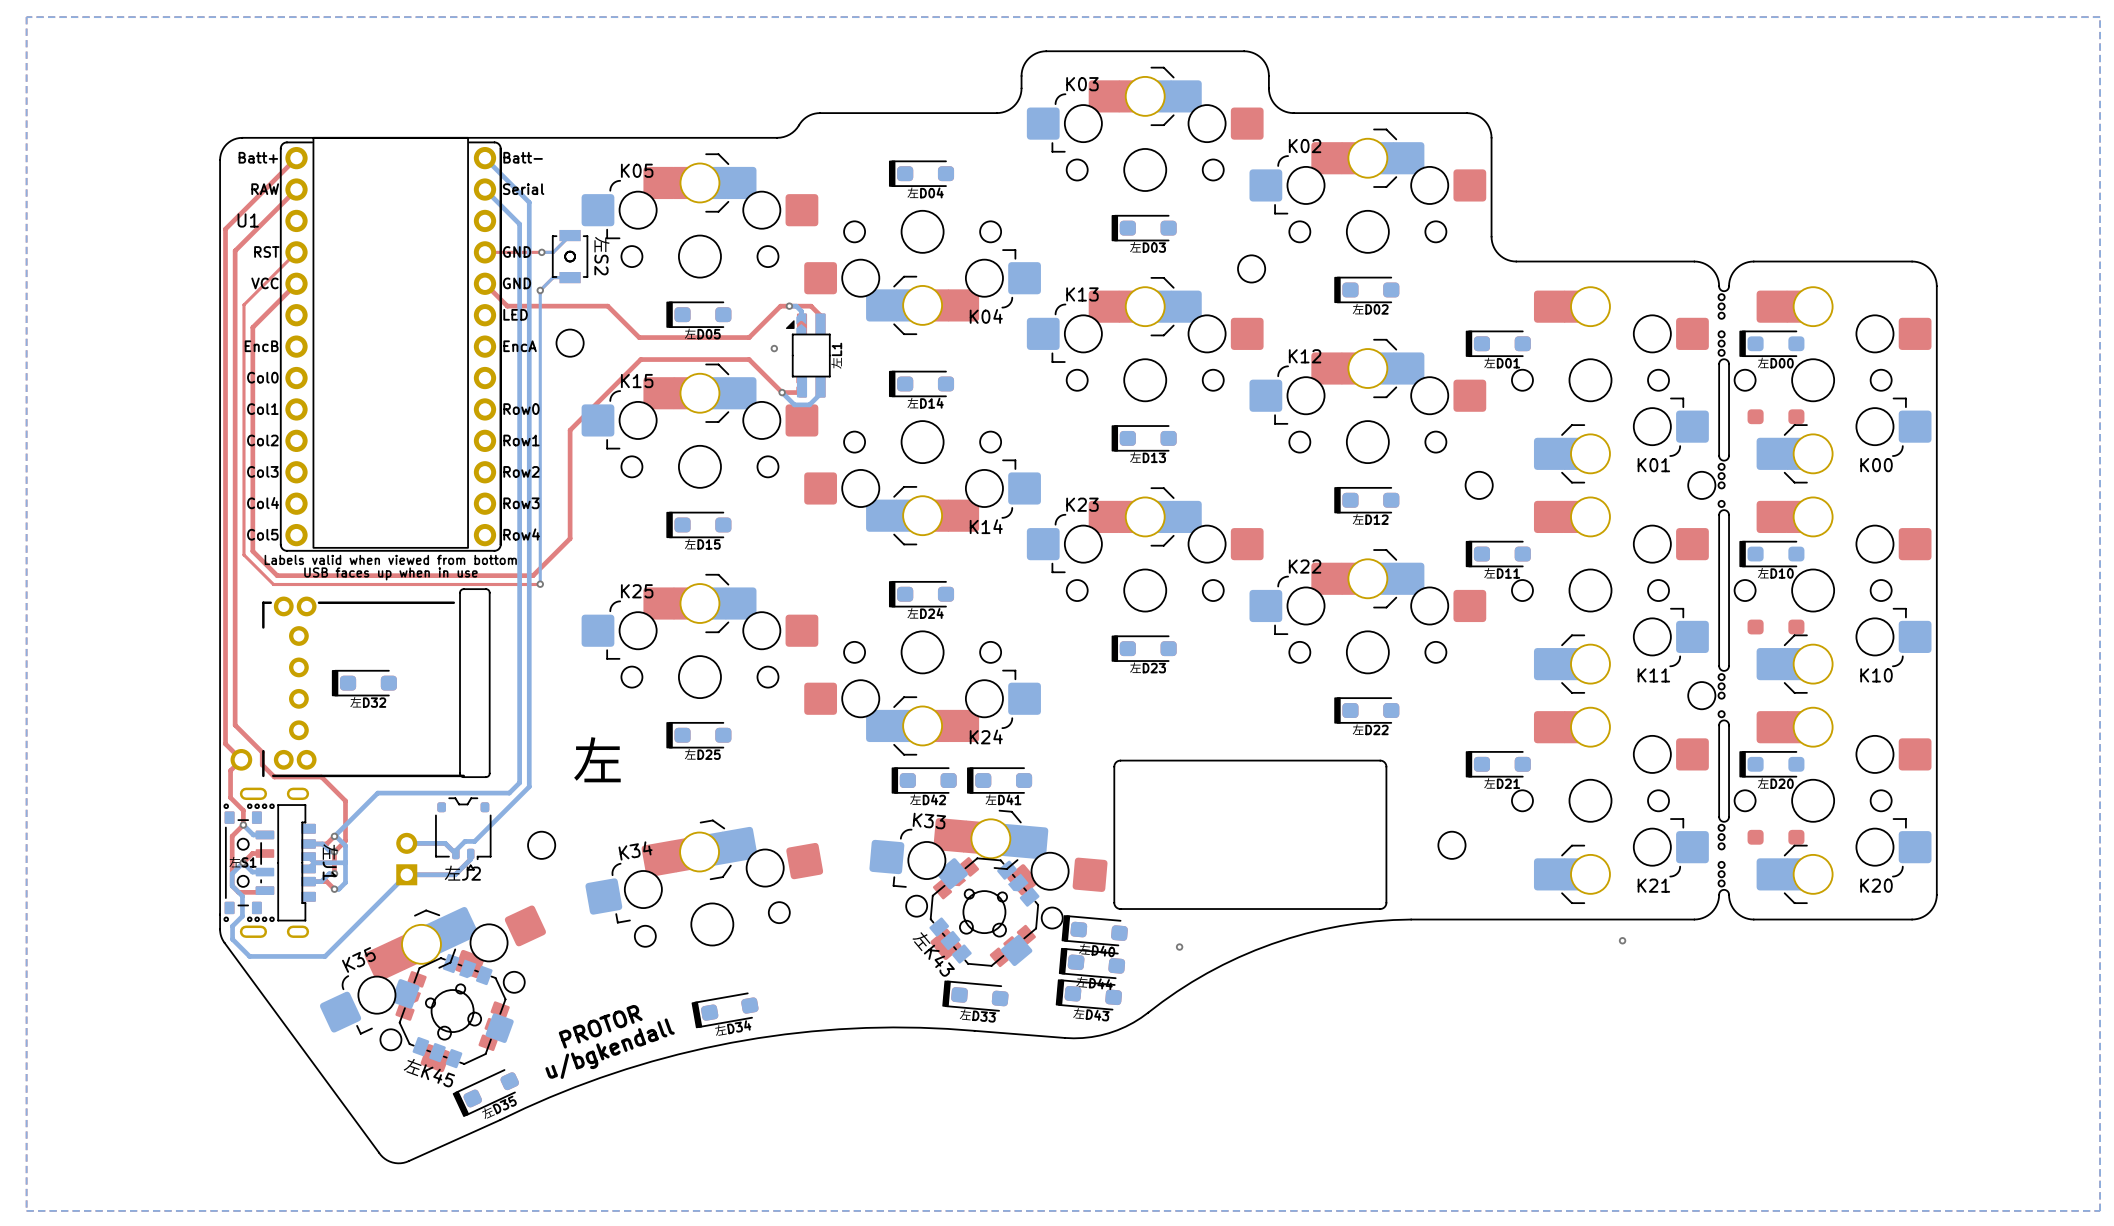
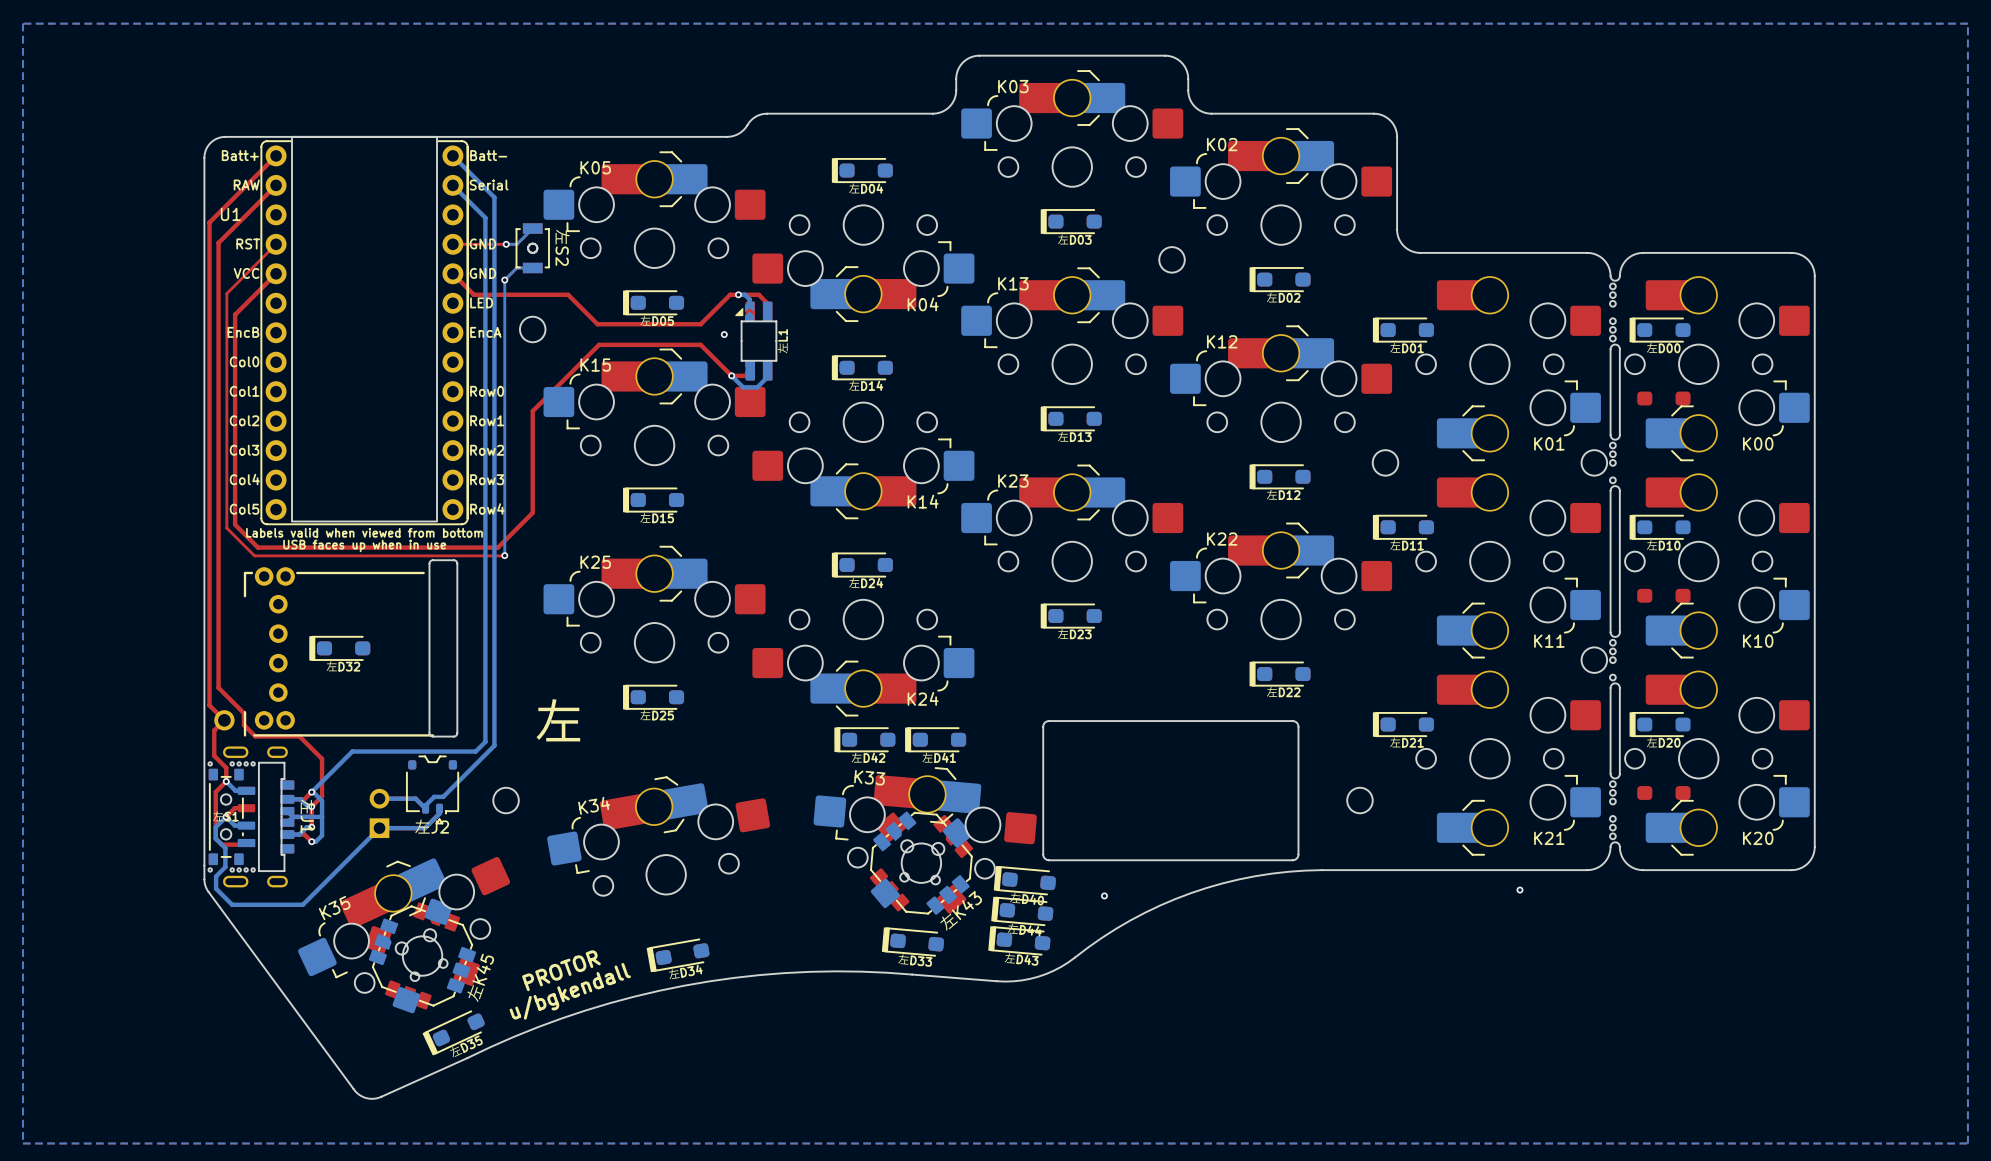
左K43 rotation: 0° (984, 912) -> 90° counterclockwise (921, 863)
part rotation: 0° (984, 912) -> 90° clockwise (921, 863)
左K45 rotation: 0° (452, 1011) -> 90° counterclockwise (422, 955)
part rotation: 0° (452, 1011) -> 90° clockwise (422, 955)

